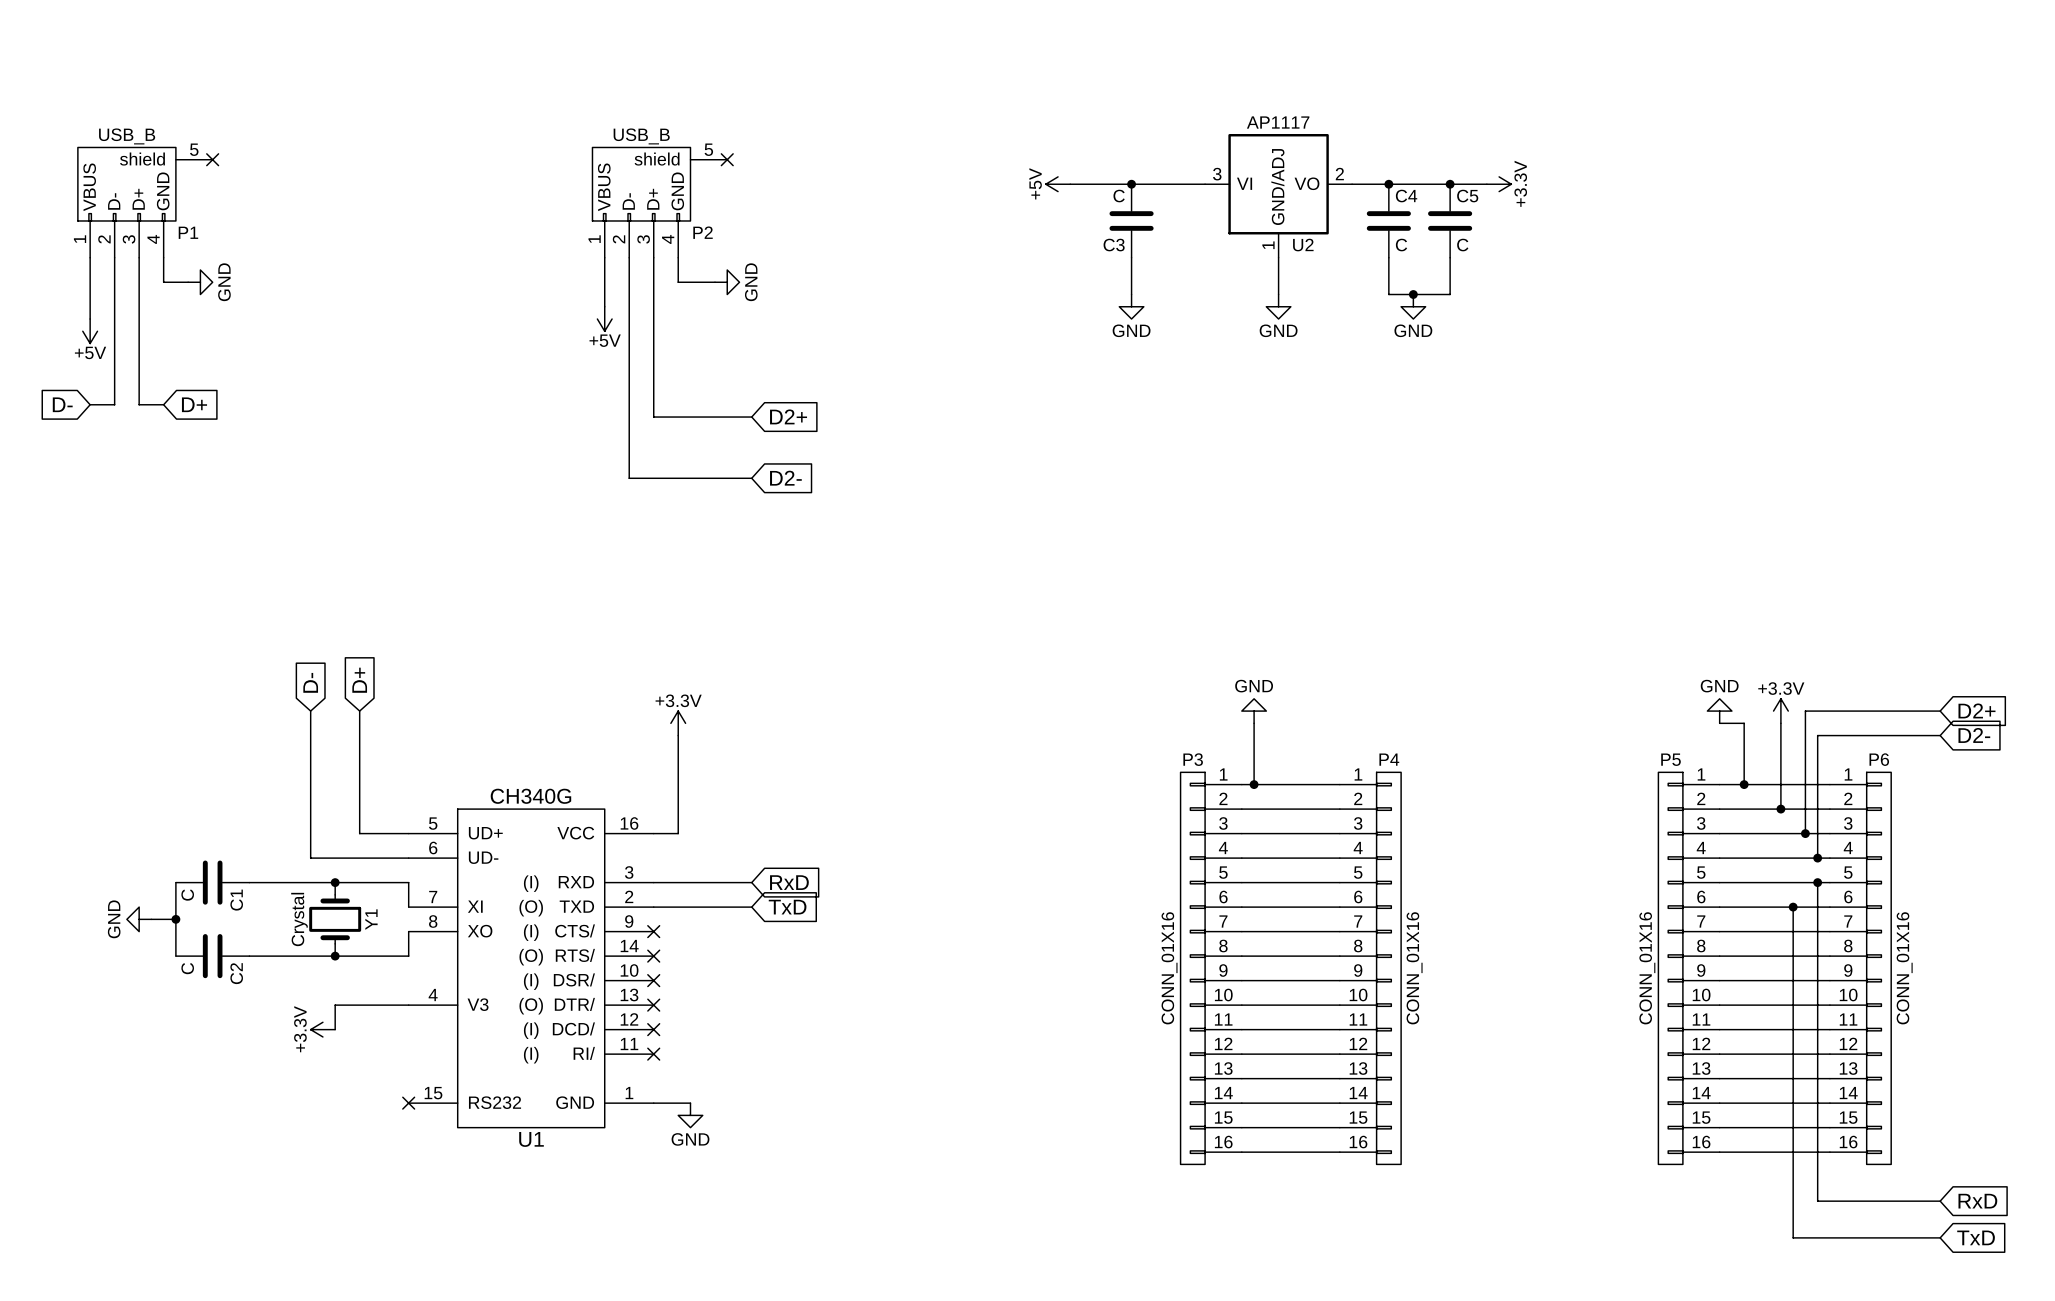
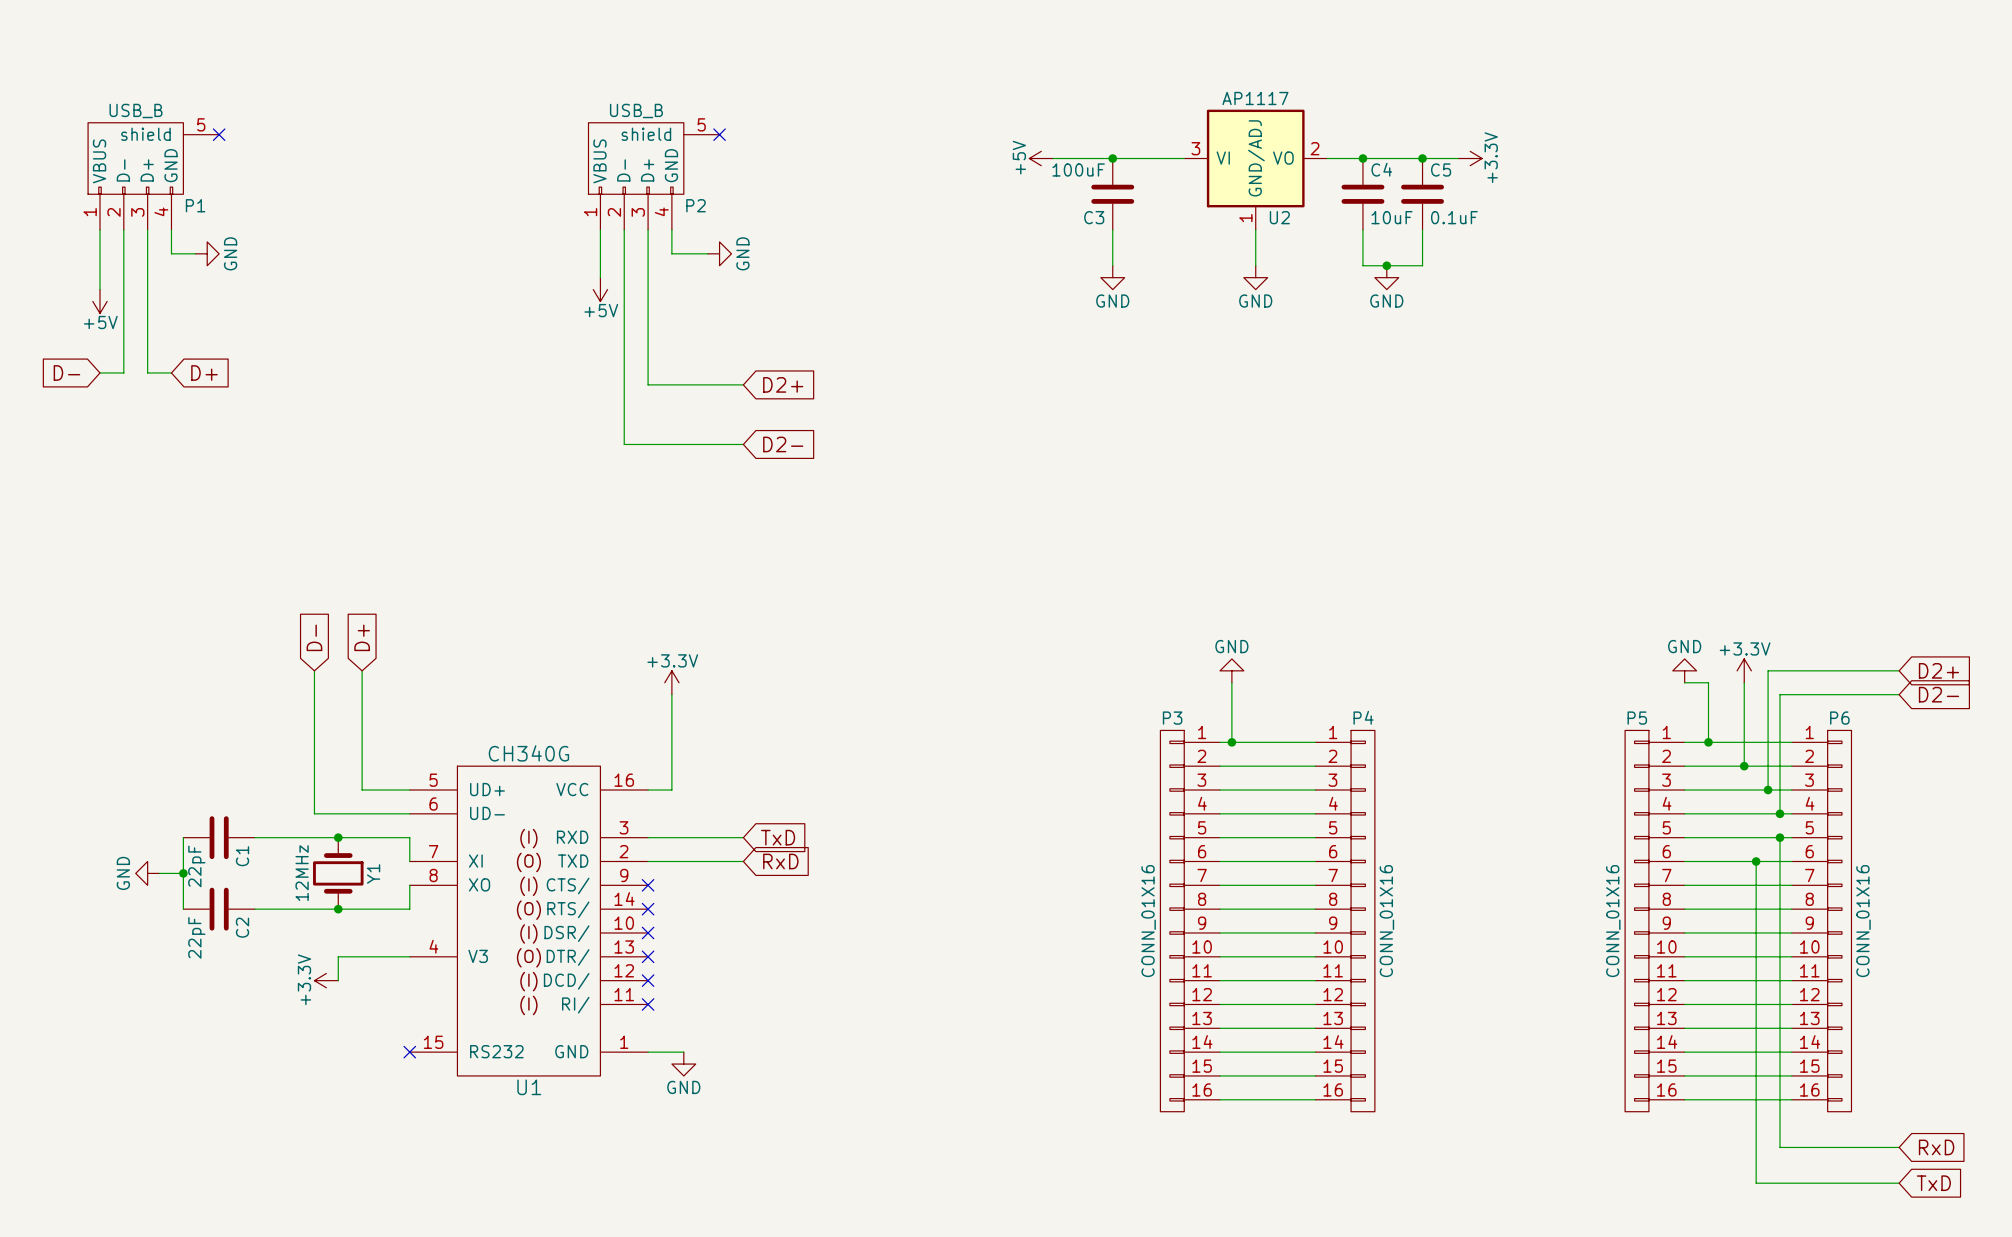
C3 value: C (1119, 196) -> 100uF (1078, 169)
C4 value: C (1401, 245) -> 10uF (1391, 217)
C5 value: C (1462, 245) -> 0.1uF (1454, 217)
global label: RxD (789, 882) -> TxD (778, 837)
C1 value: C (187, 895) -> 22pF (196, 866)
global label: TxD (787, 907) -> RxD (780, 861)
Y1 value: Crystal (299, 919) -> 12MHz (302, 873)
C2 value: C (187, 968) -> 22pF (196, 937)

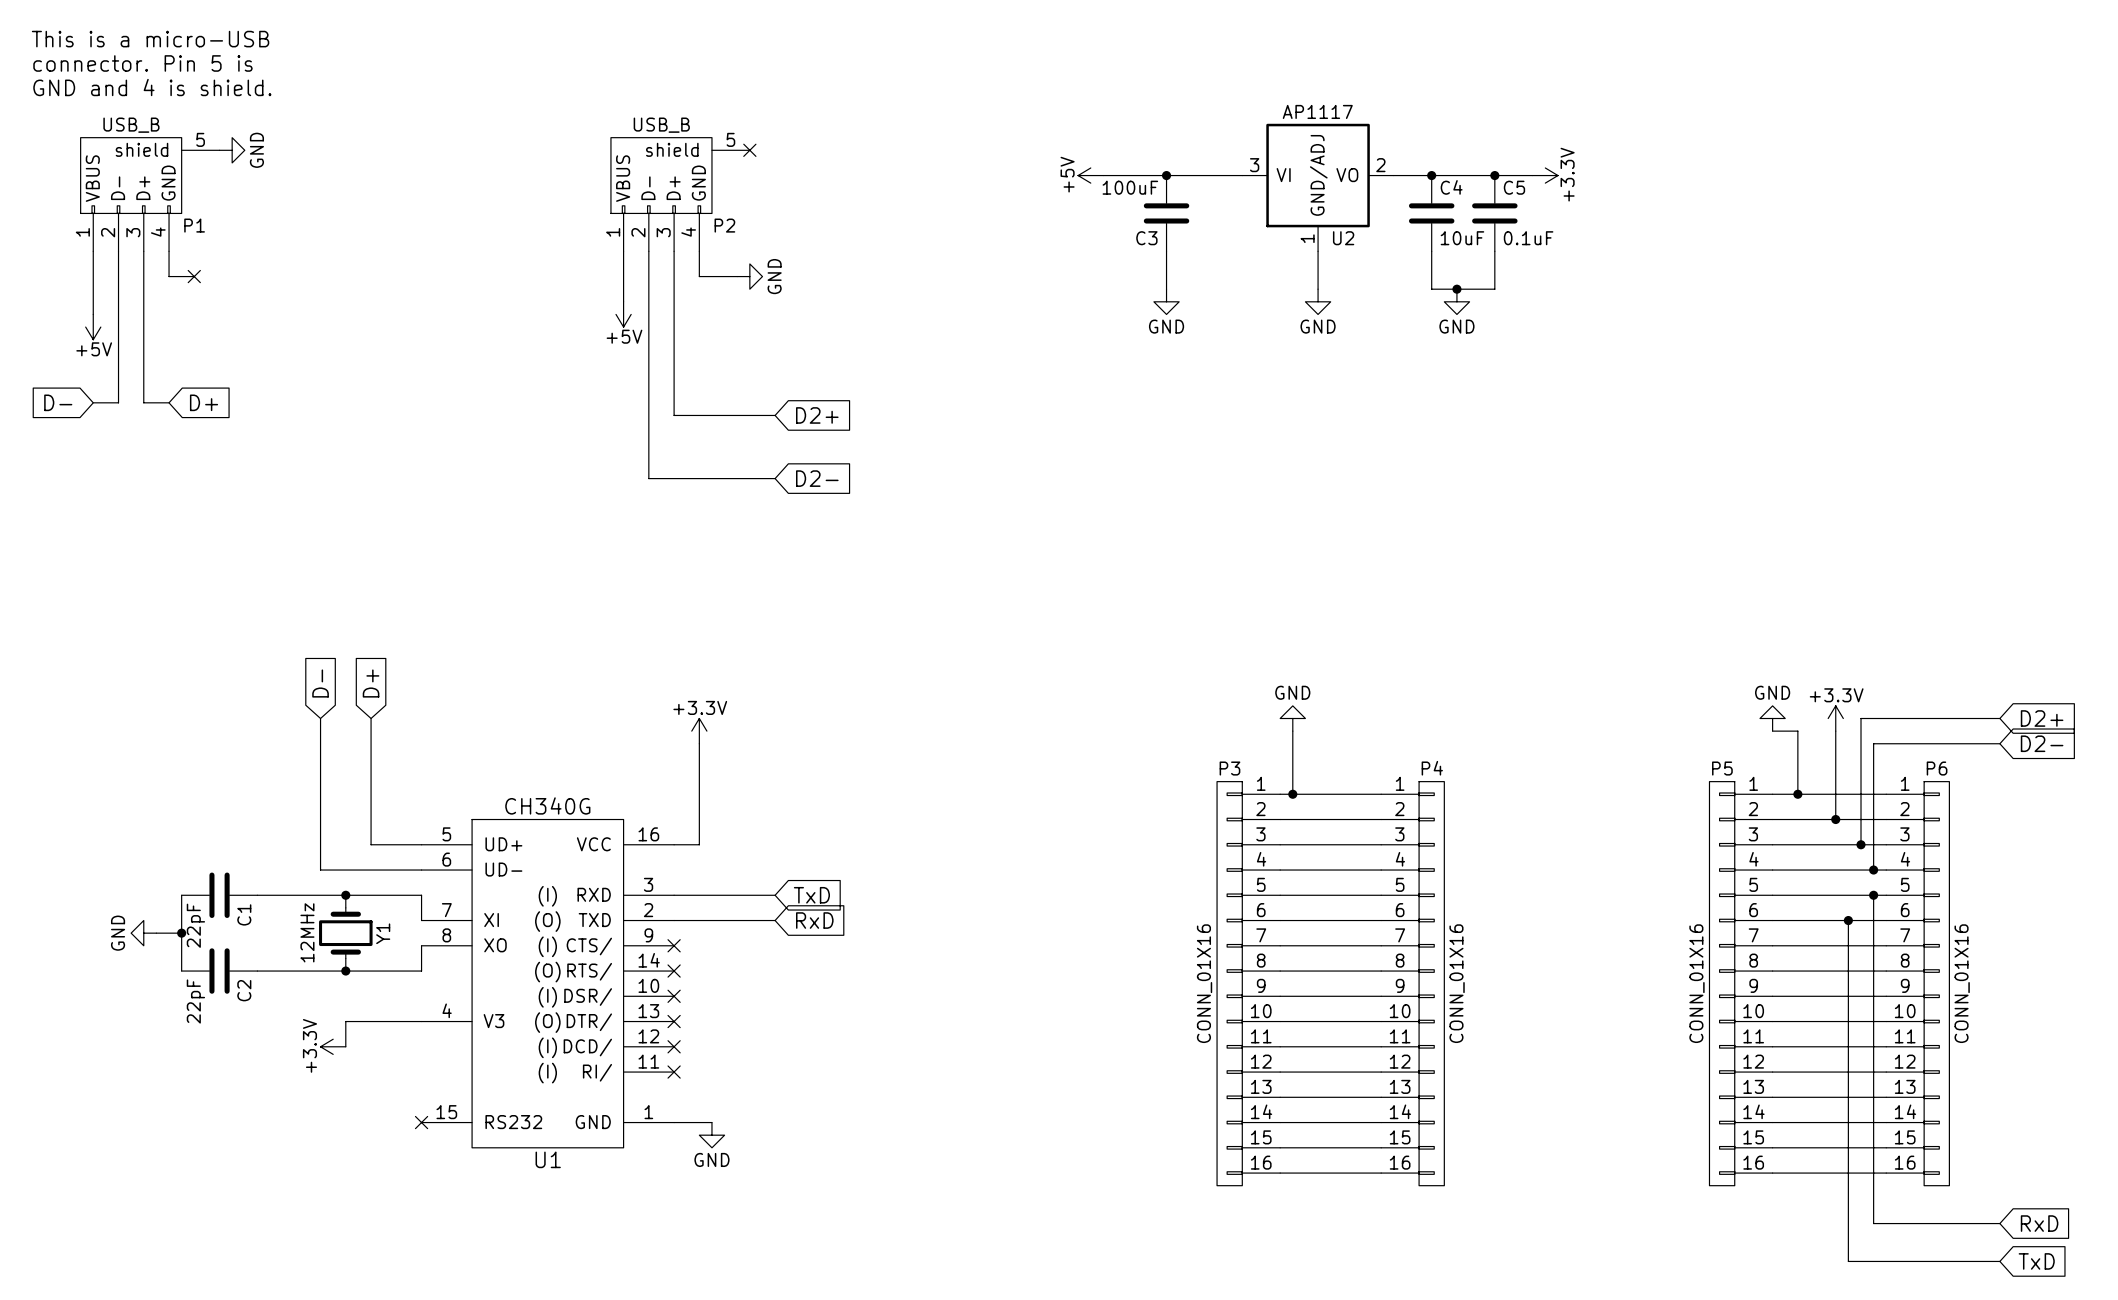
text: none -> This is a micro-USB (150, 39)
text: none -> connector. Pin 5 is (142, 63)
text: none -> GND and 4 is shield. (152, 87)
no-connect mark: (219, 134) -> none
no-connect mark: none -> (194, 276)
power symbol position: GND (207, 253) -> GND (232, 150)

